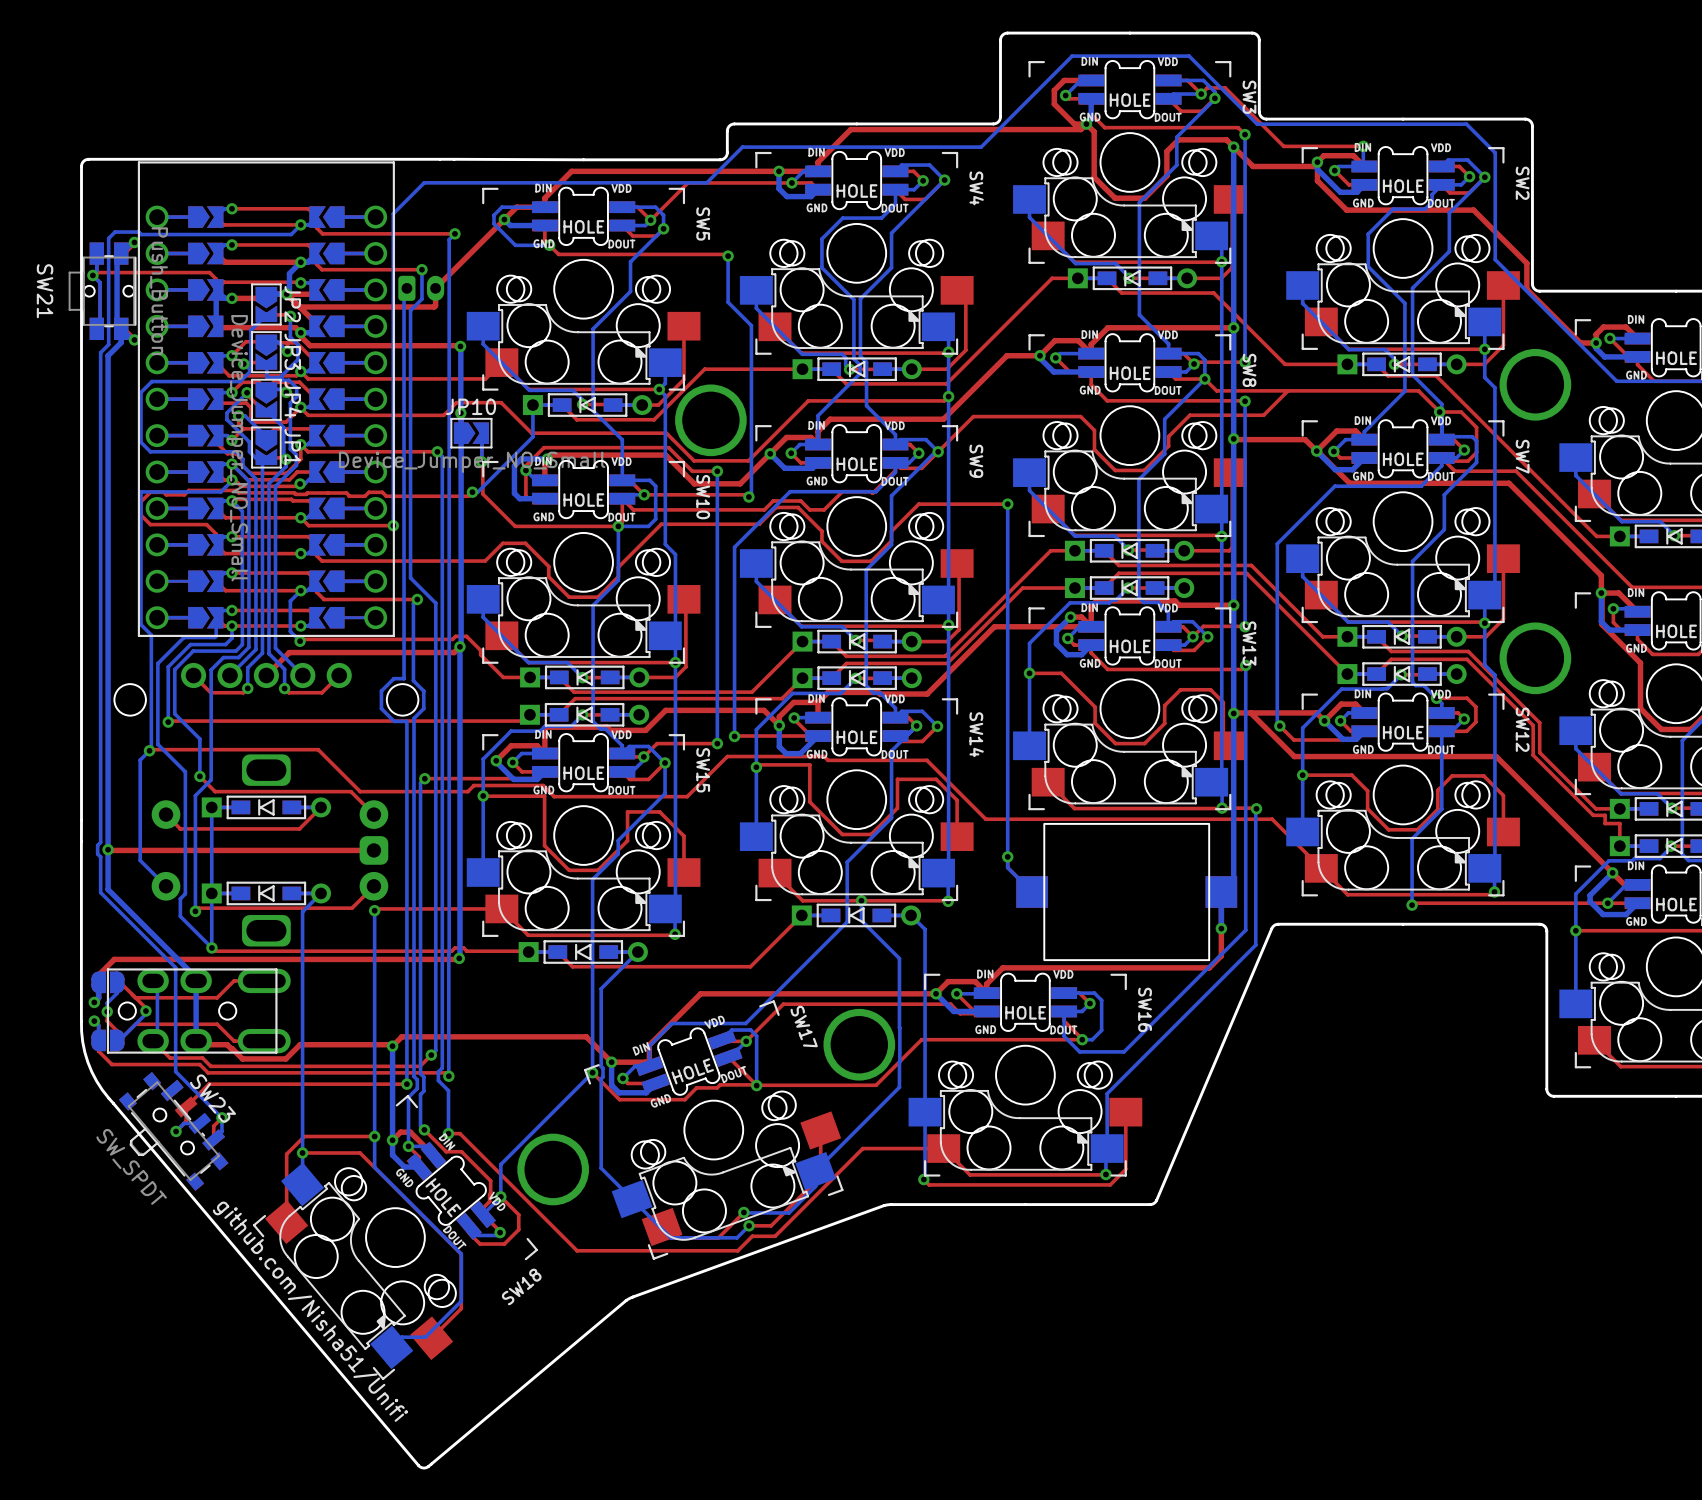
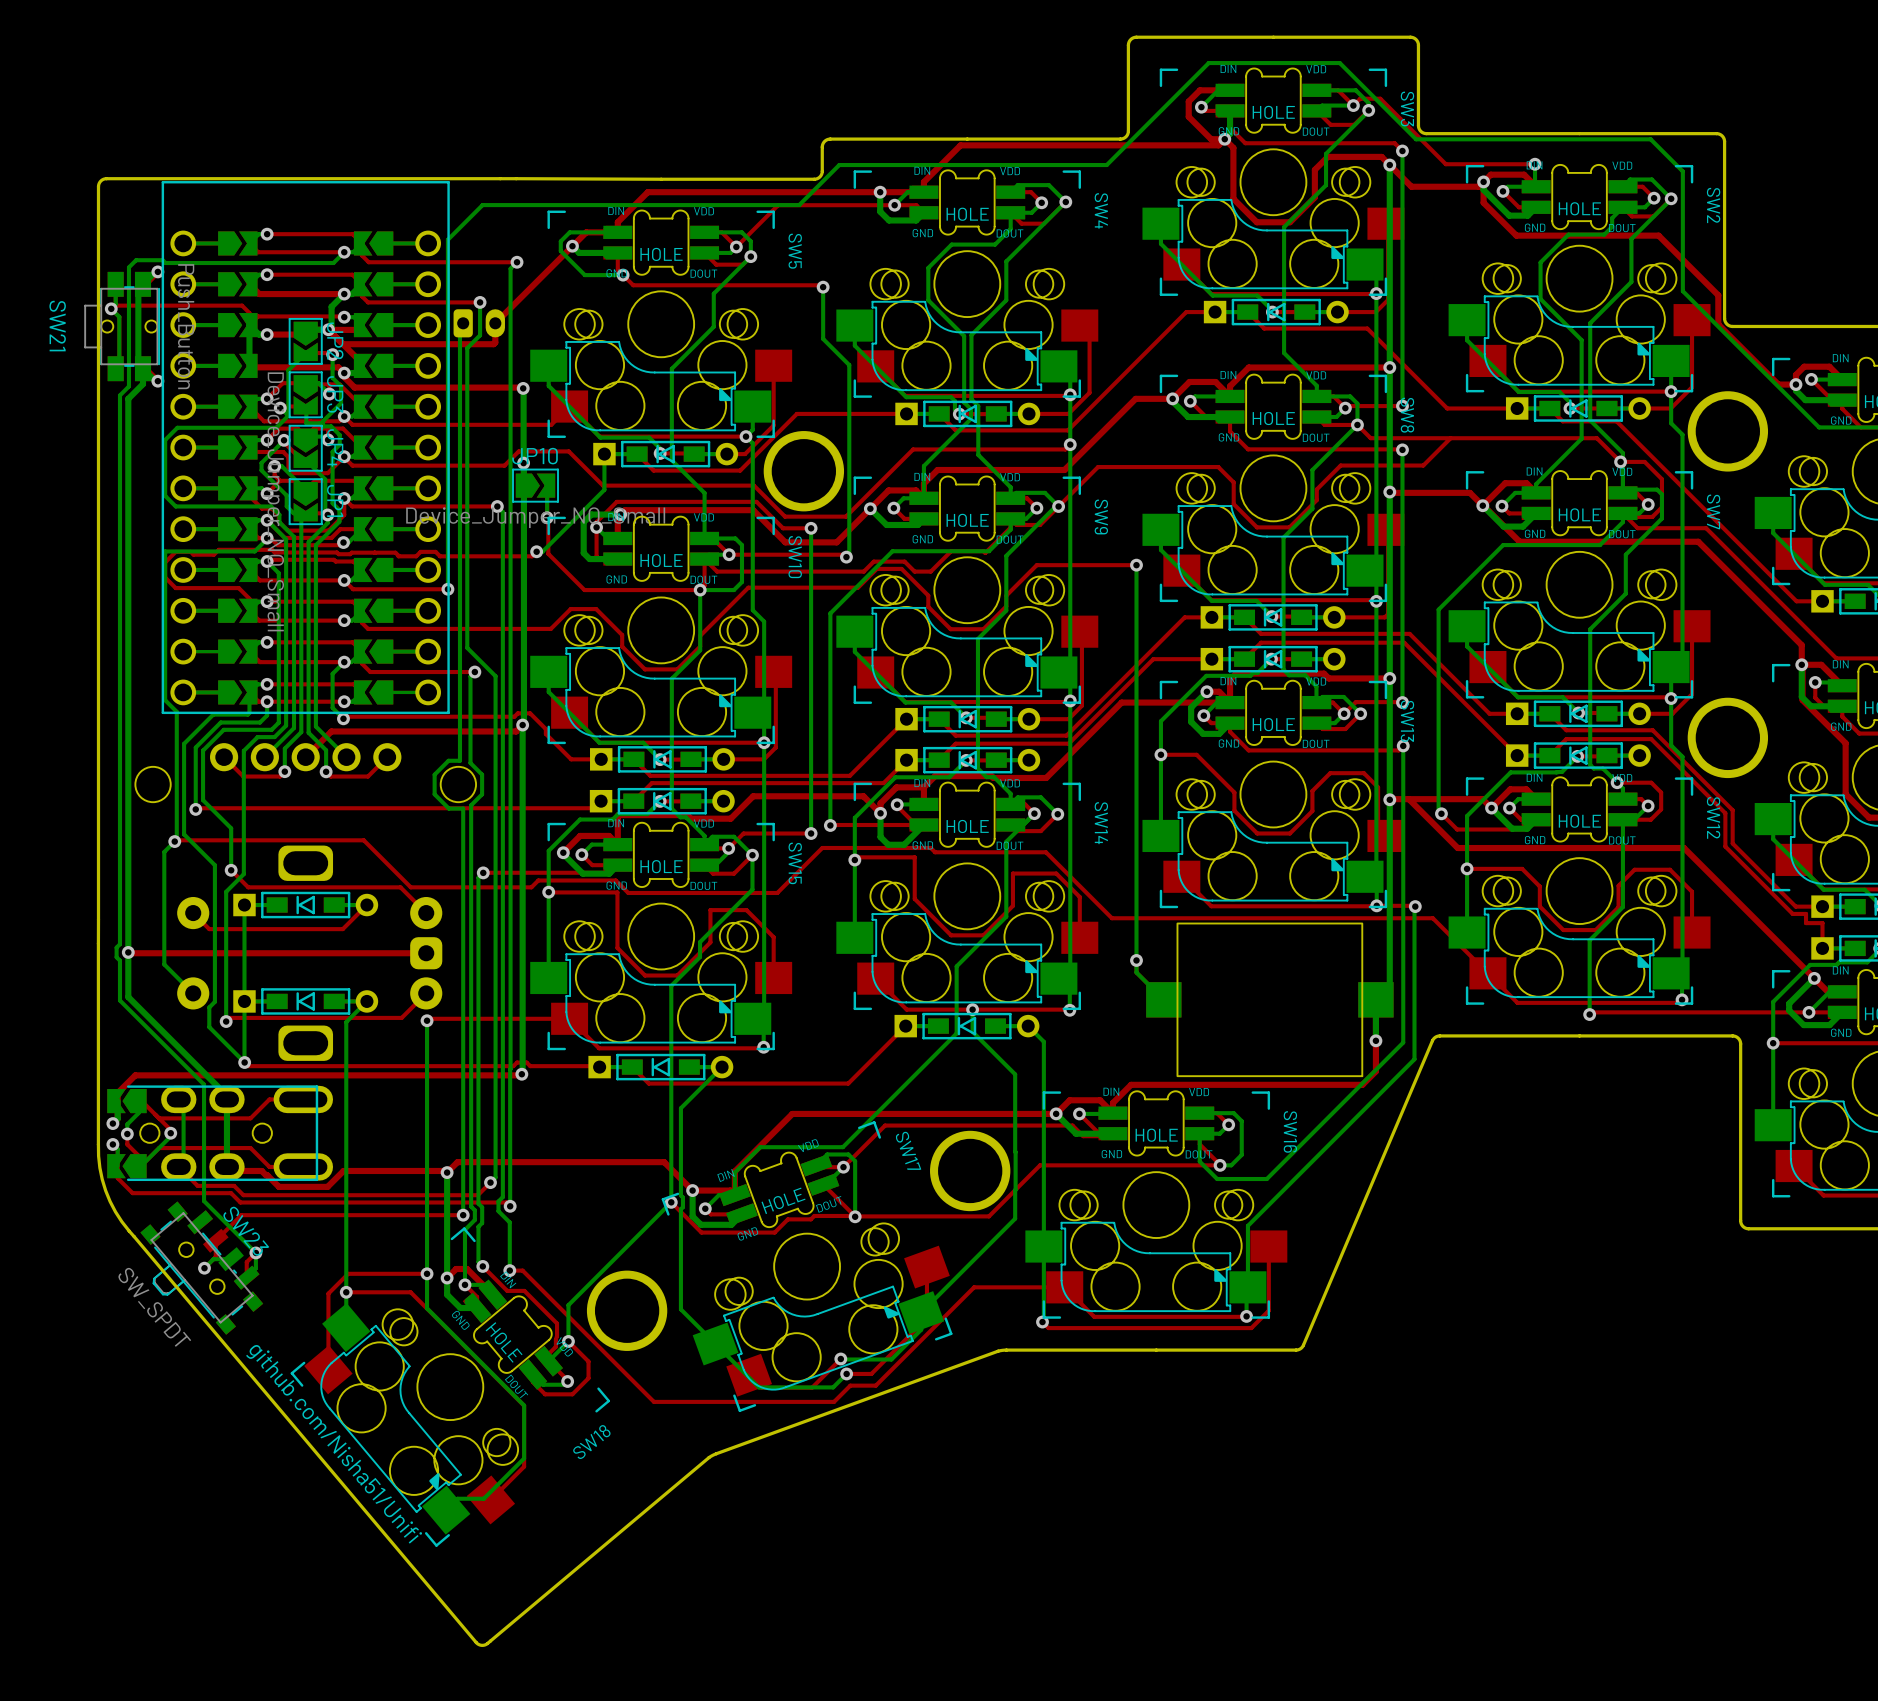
part footprint: [91, 968, 291, 1054] -> [107, 1085, 334, 1182]

